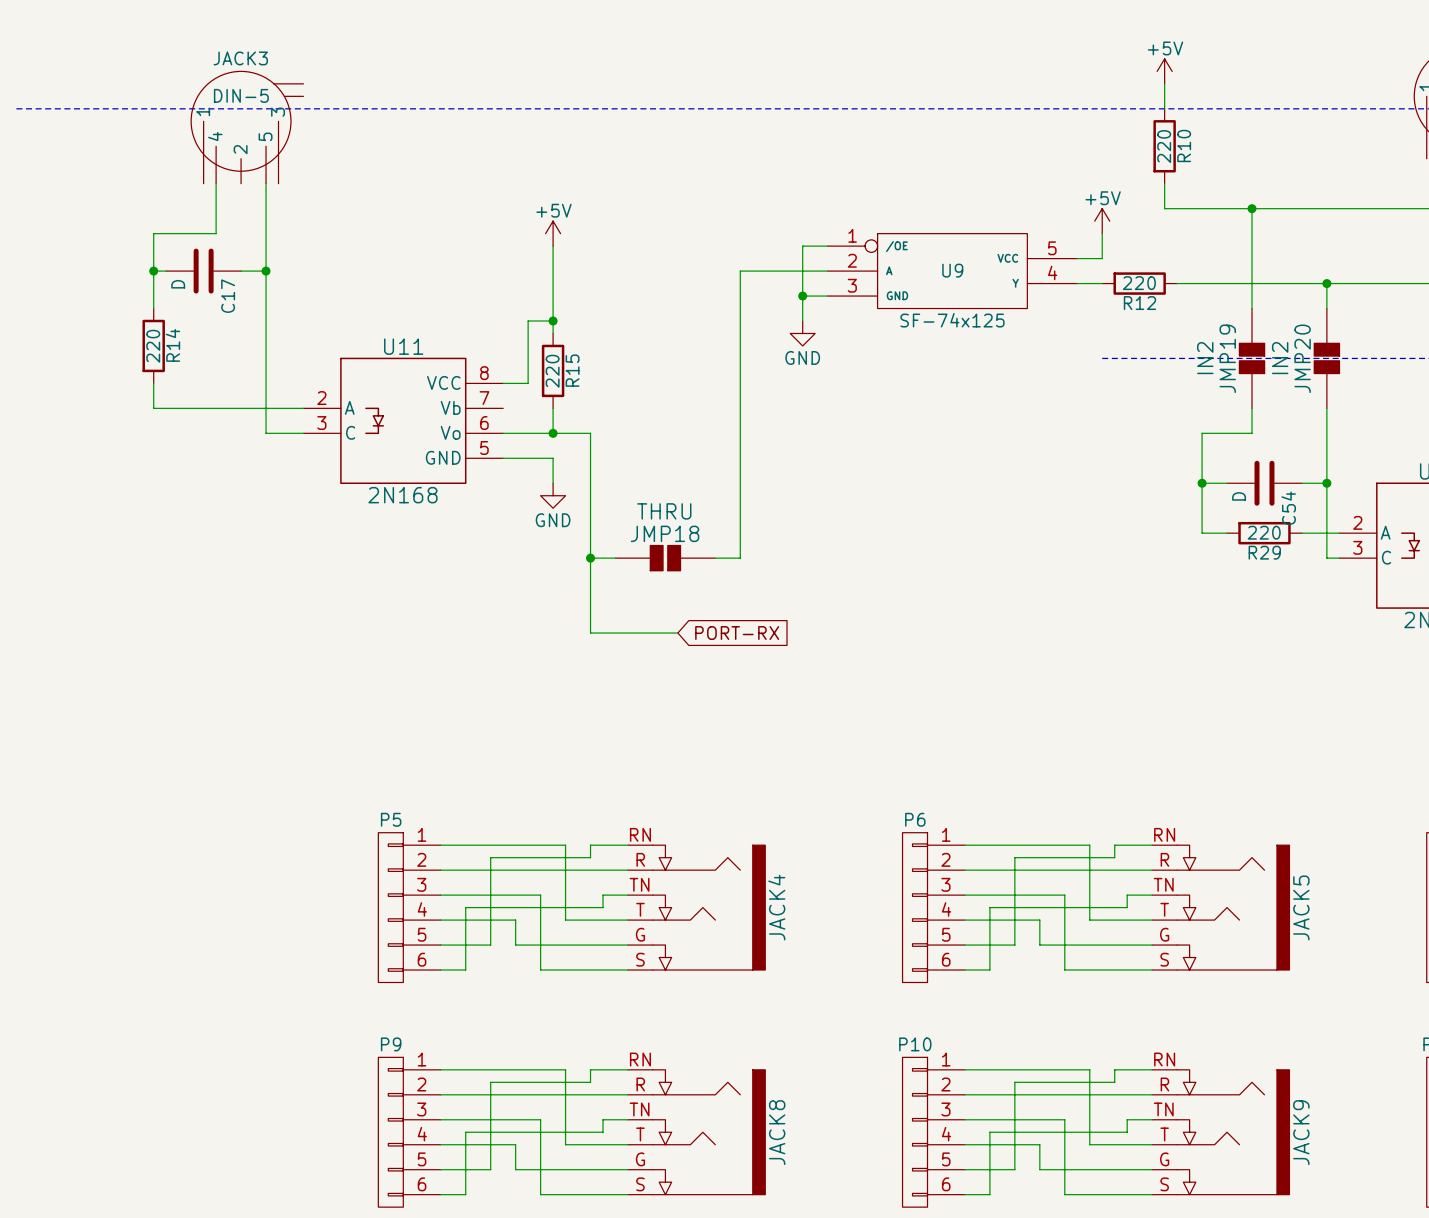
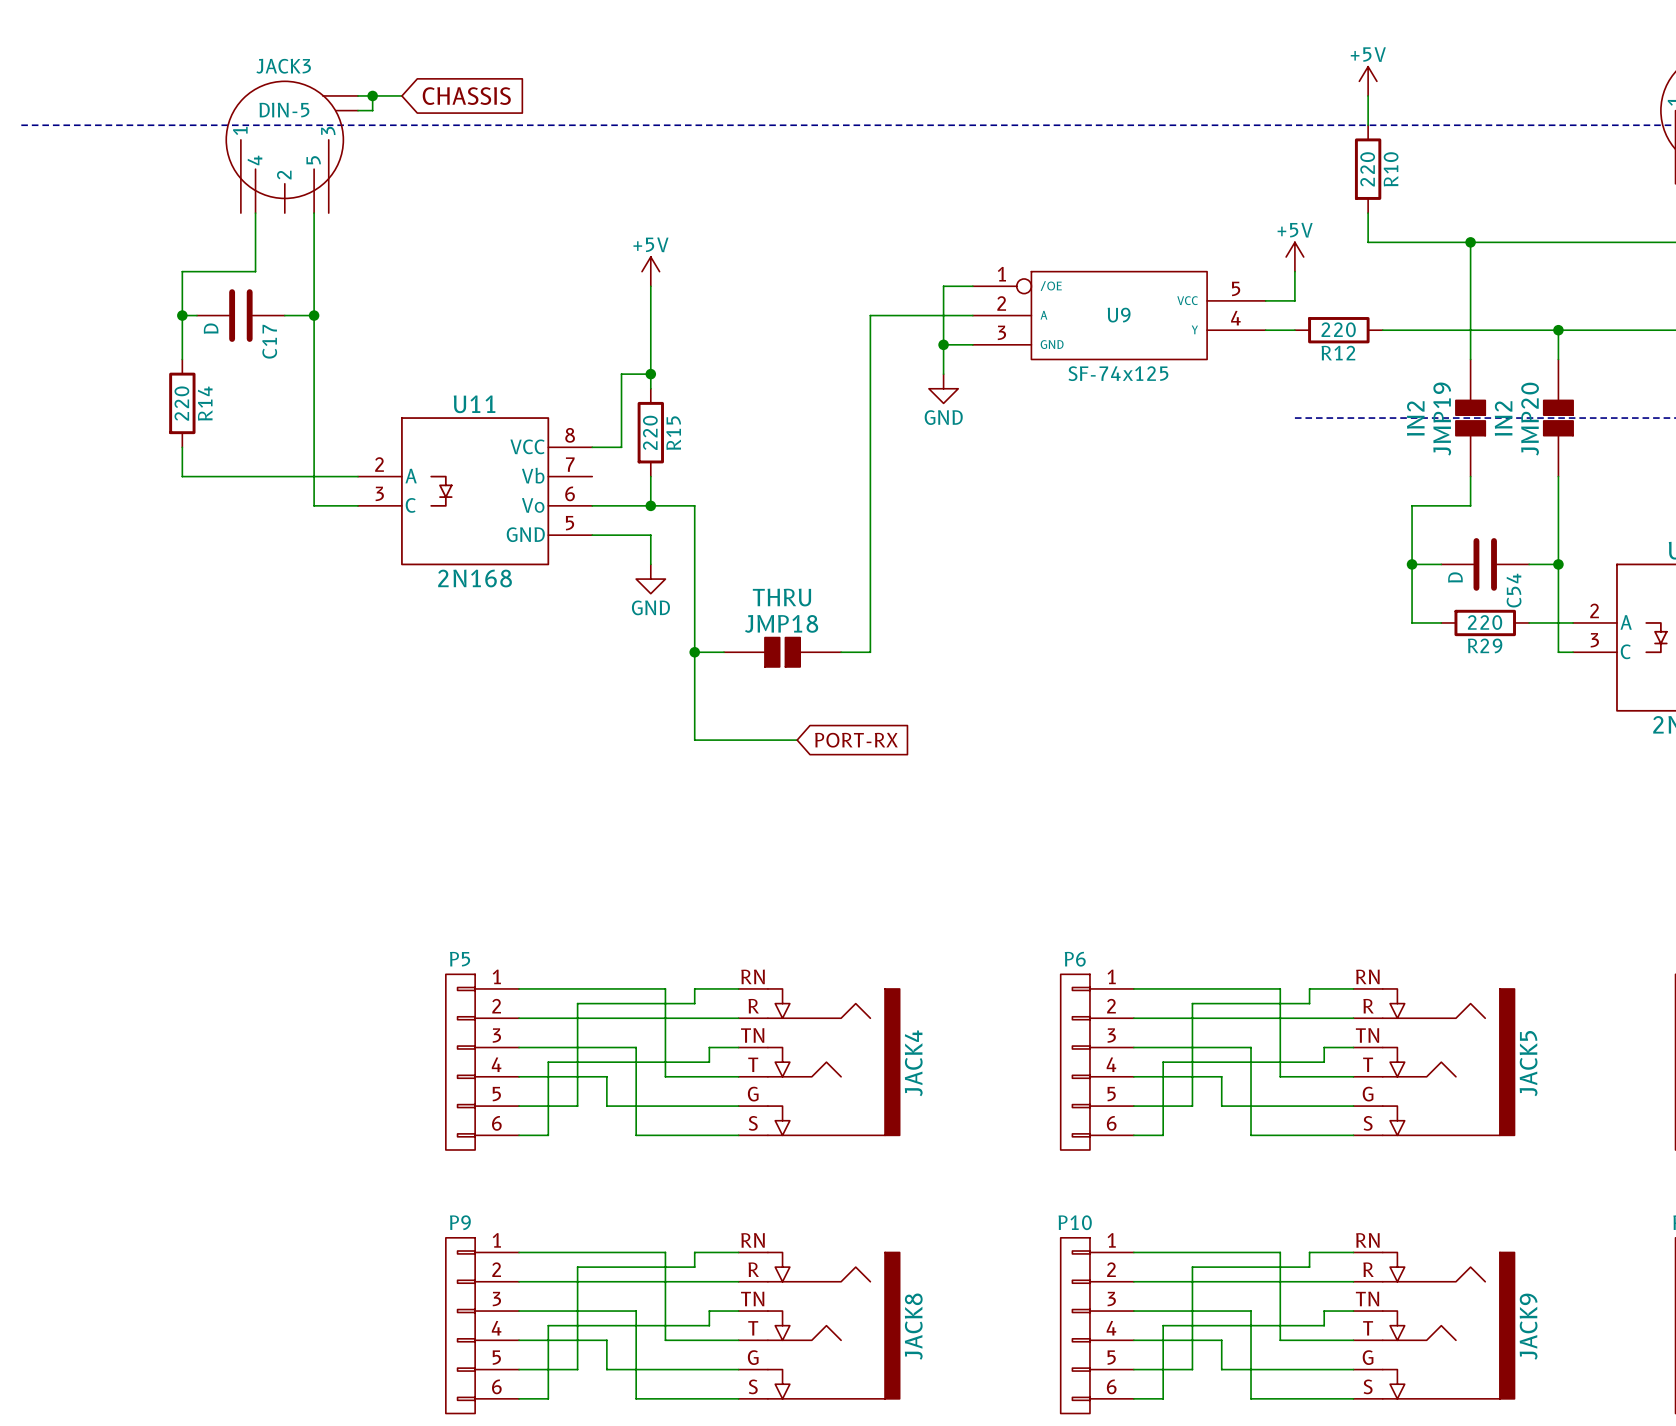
wire: none -> (358, 95) (401, 95)
wire: none -> (372, 95) (372, 110) (358, 110)
junction: none -> (372, 95)
global label: none -> CHASSIS (466, 96)

